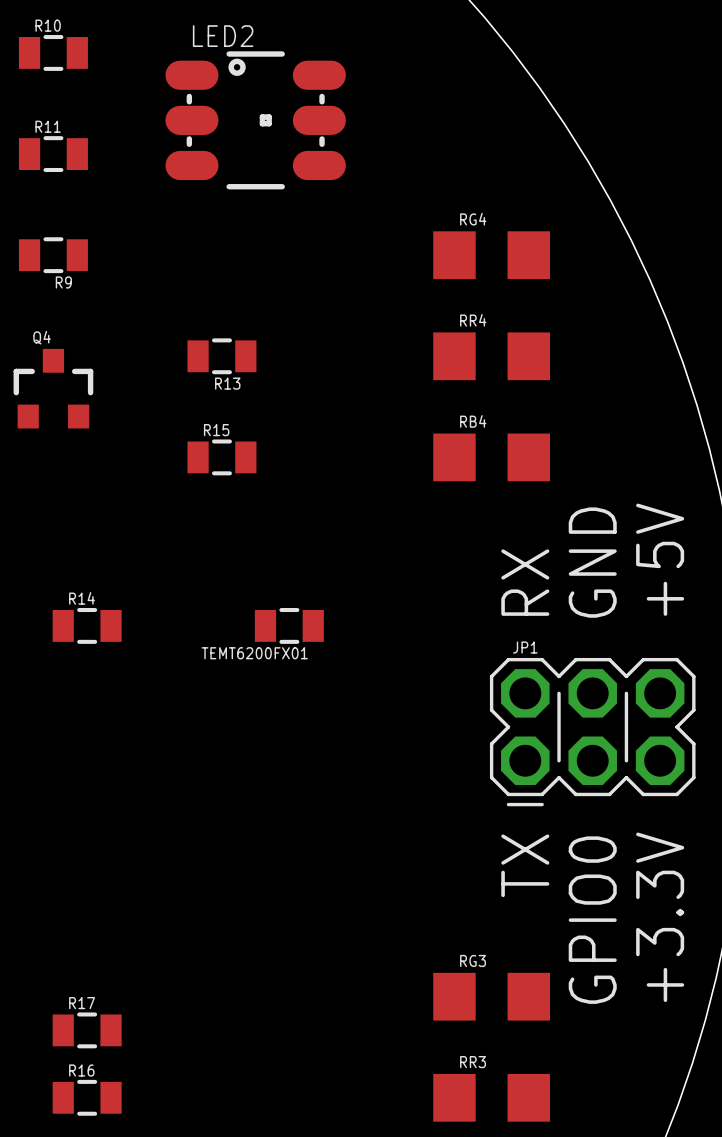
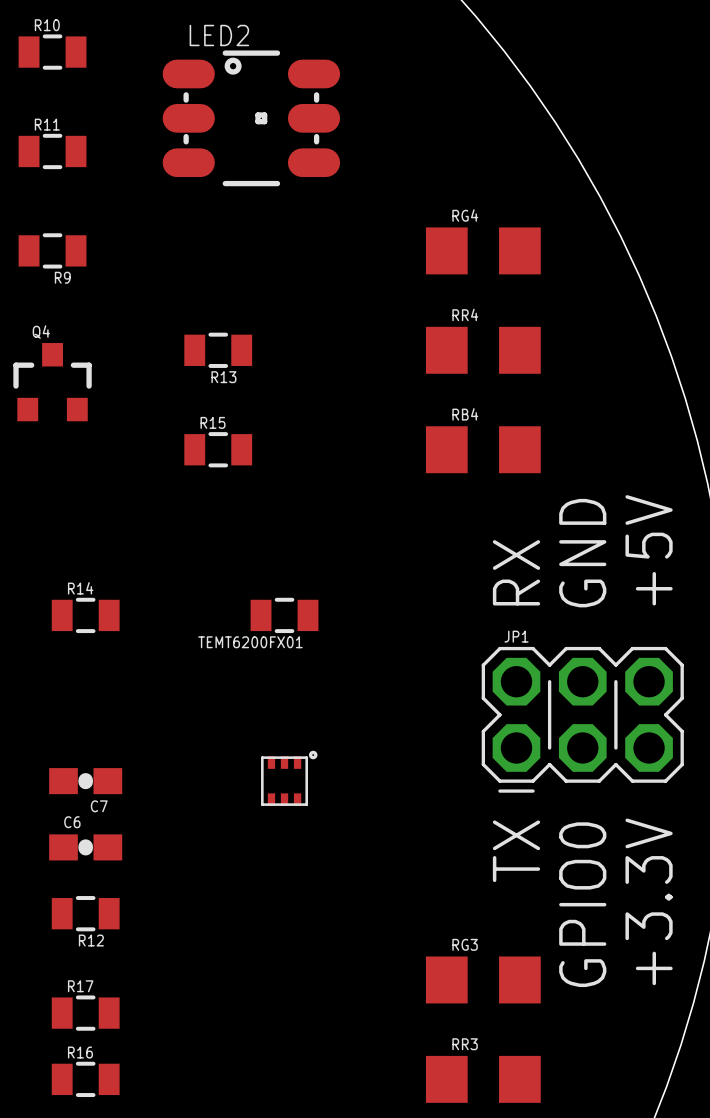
part: none -> (289, 778)
C7: none -> (85, 781)
C6: none -> (85, 847)
R12: none -> (85, 913)

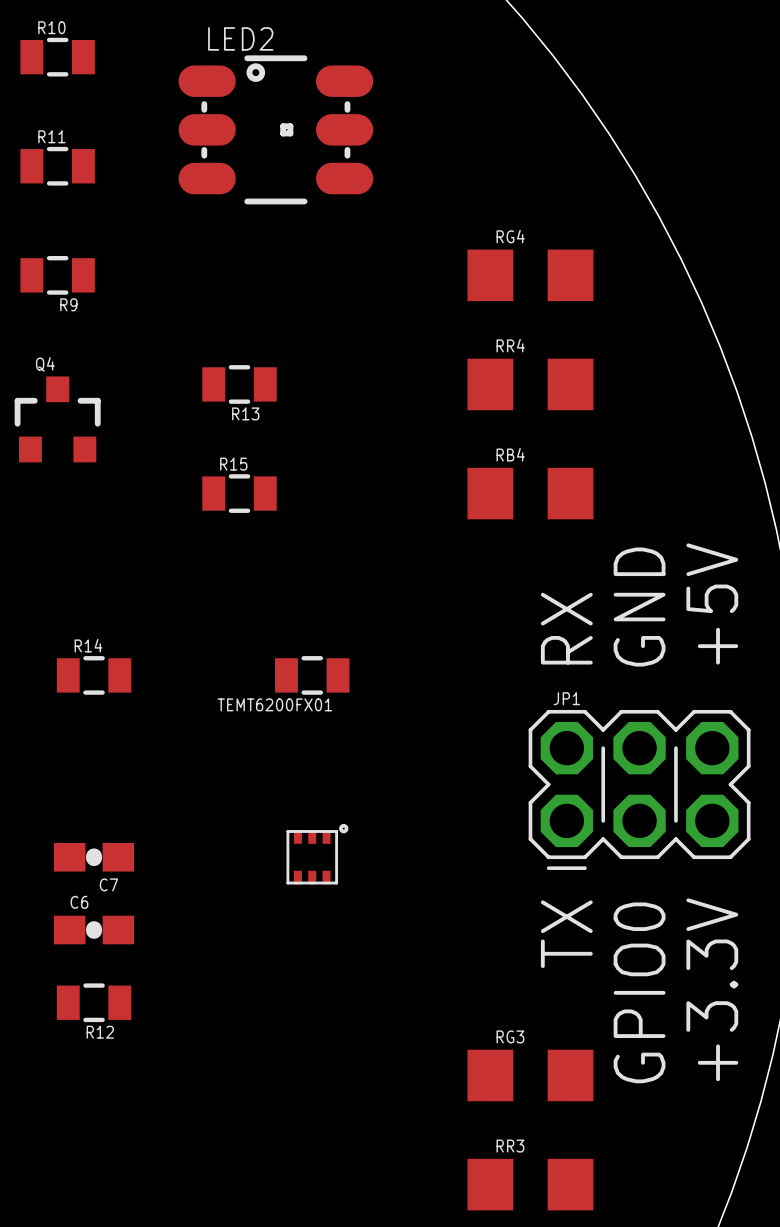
R17: (85, 1013) -> none
R16: (85, 1079) -> none

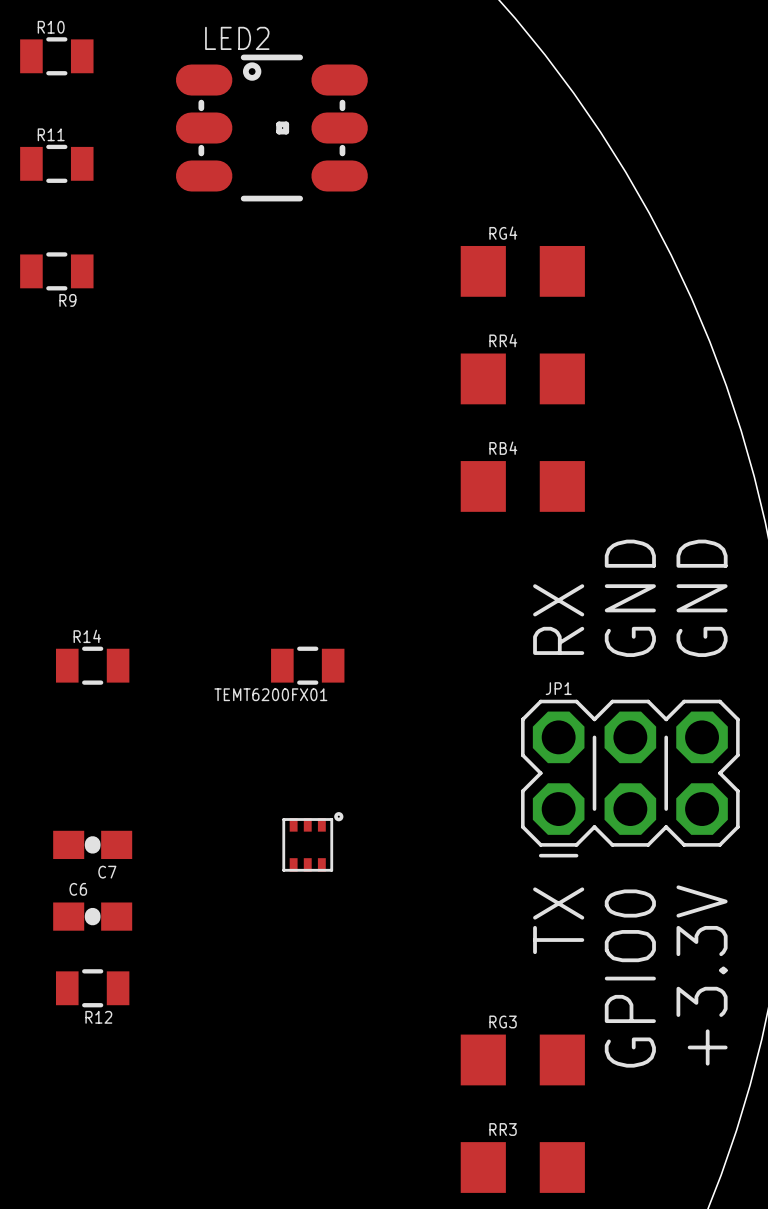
R13: (239, 384) -> none
Q4: (57, 419) -> none
R15: (239, 493) -> none
text: +5V (712, 603) -> GND (702, 598)

